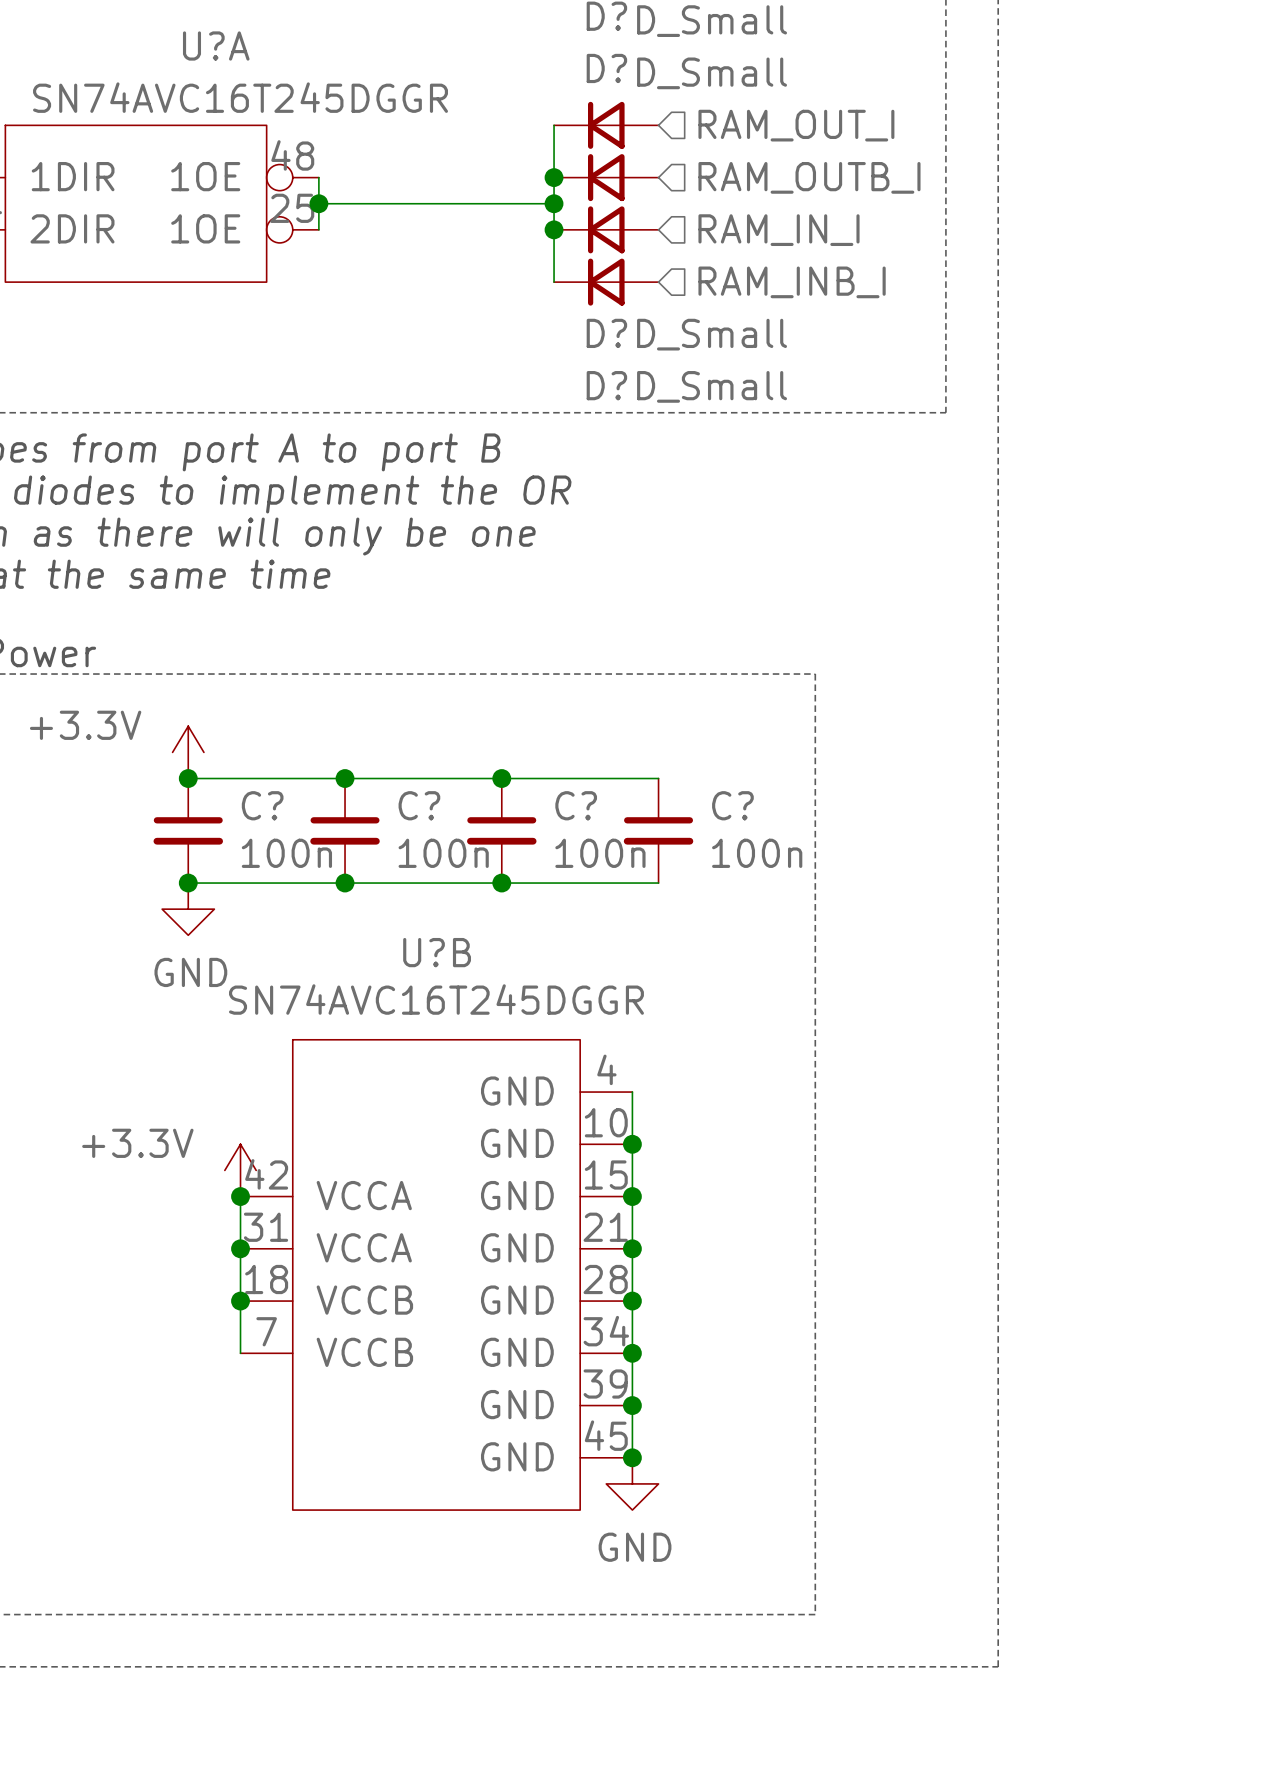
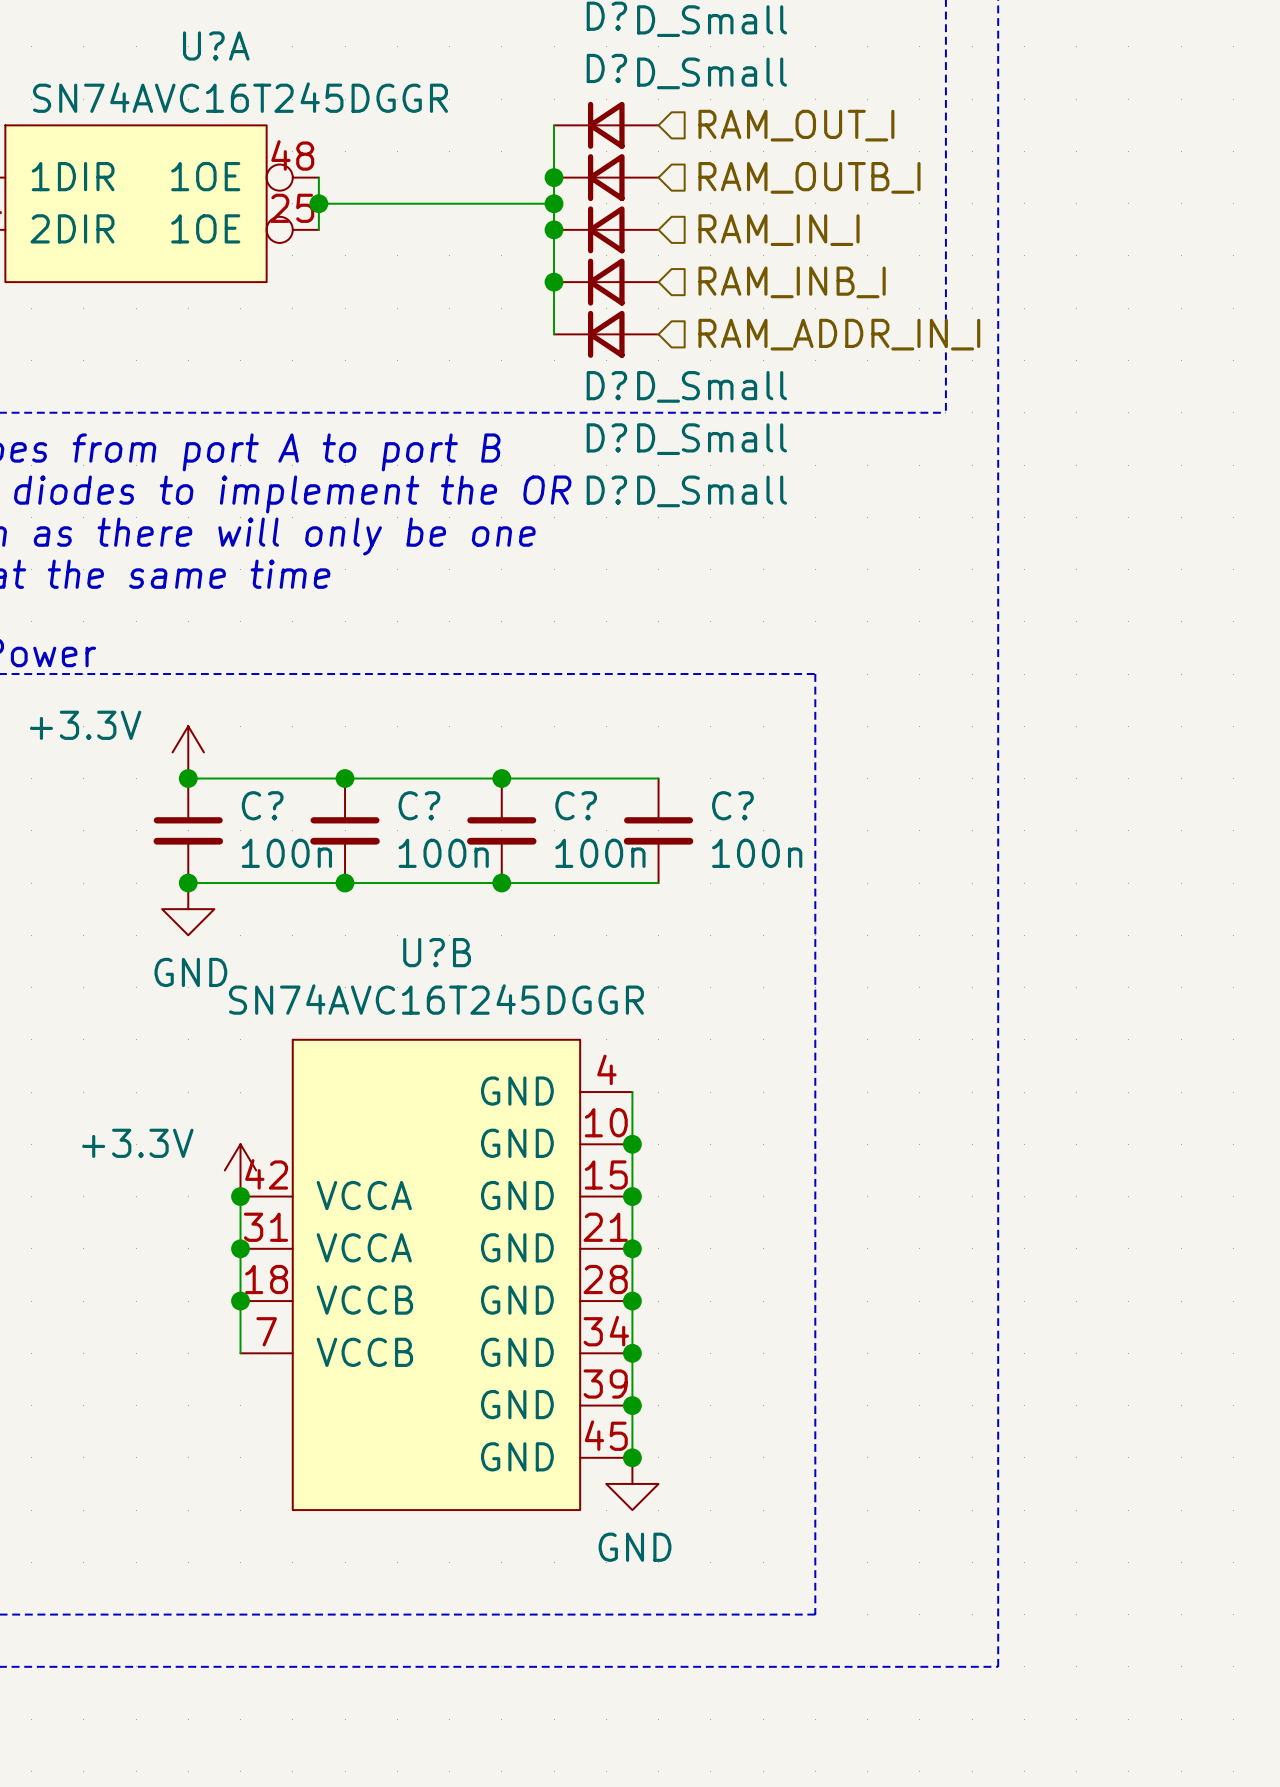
wire: none -> (554, 282) (554, 334)
junction: none -> (554, 282)
D? name position: D? (606, 333) -> D? (606, 490)
D?: none -> D_Small (606, 334)
D? value position: D_Small (712, 334) -> D_Small (712, 491)
hierarchical label: none -> RAM_ADDR_IN_I (839, 334)

